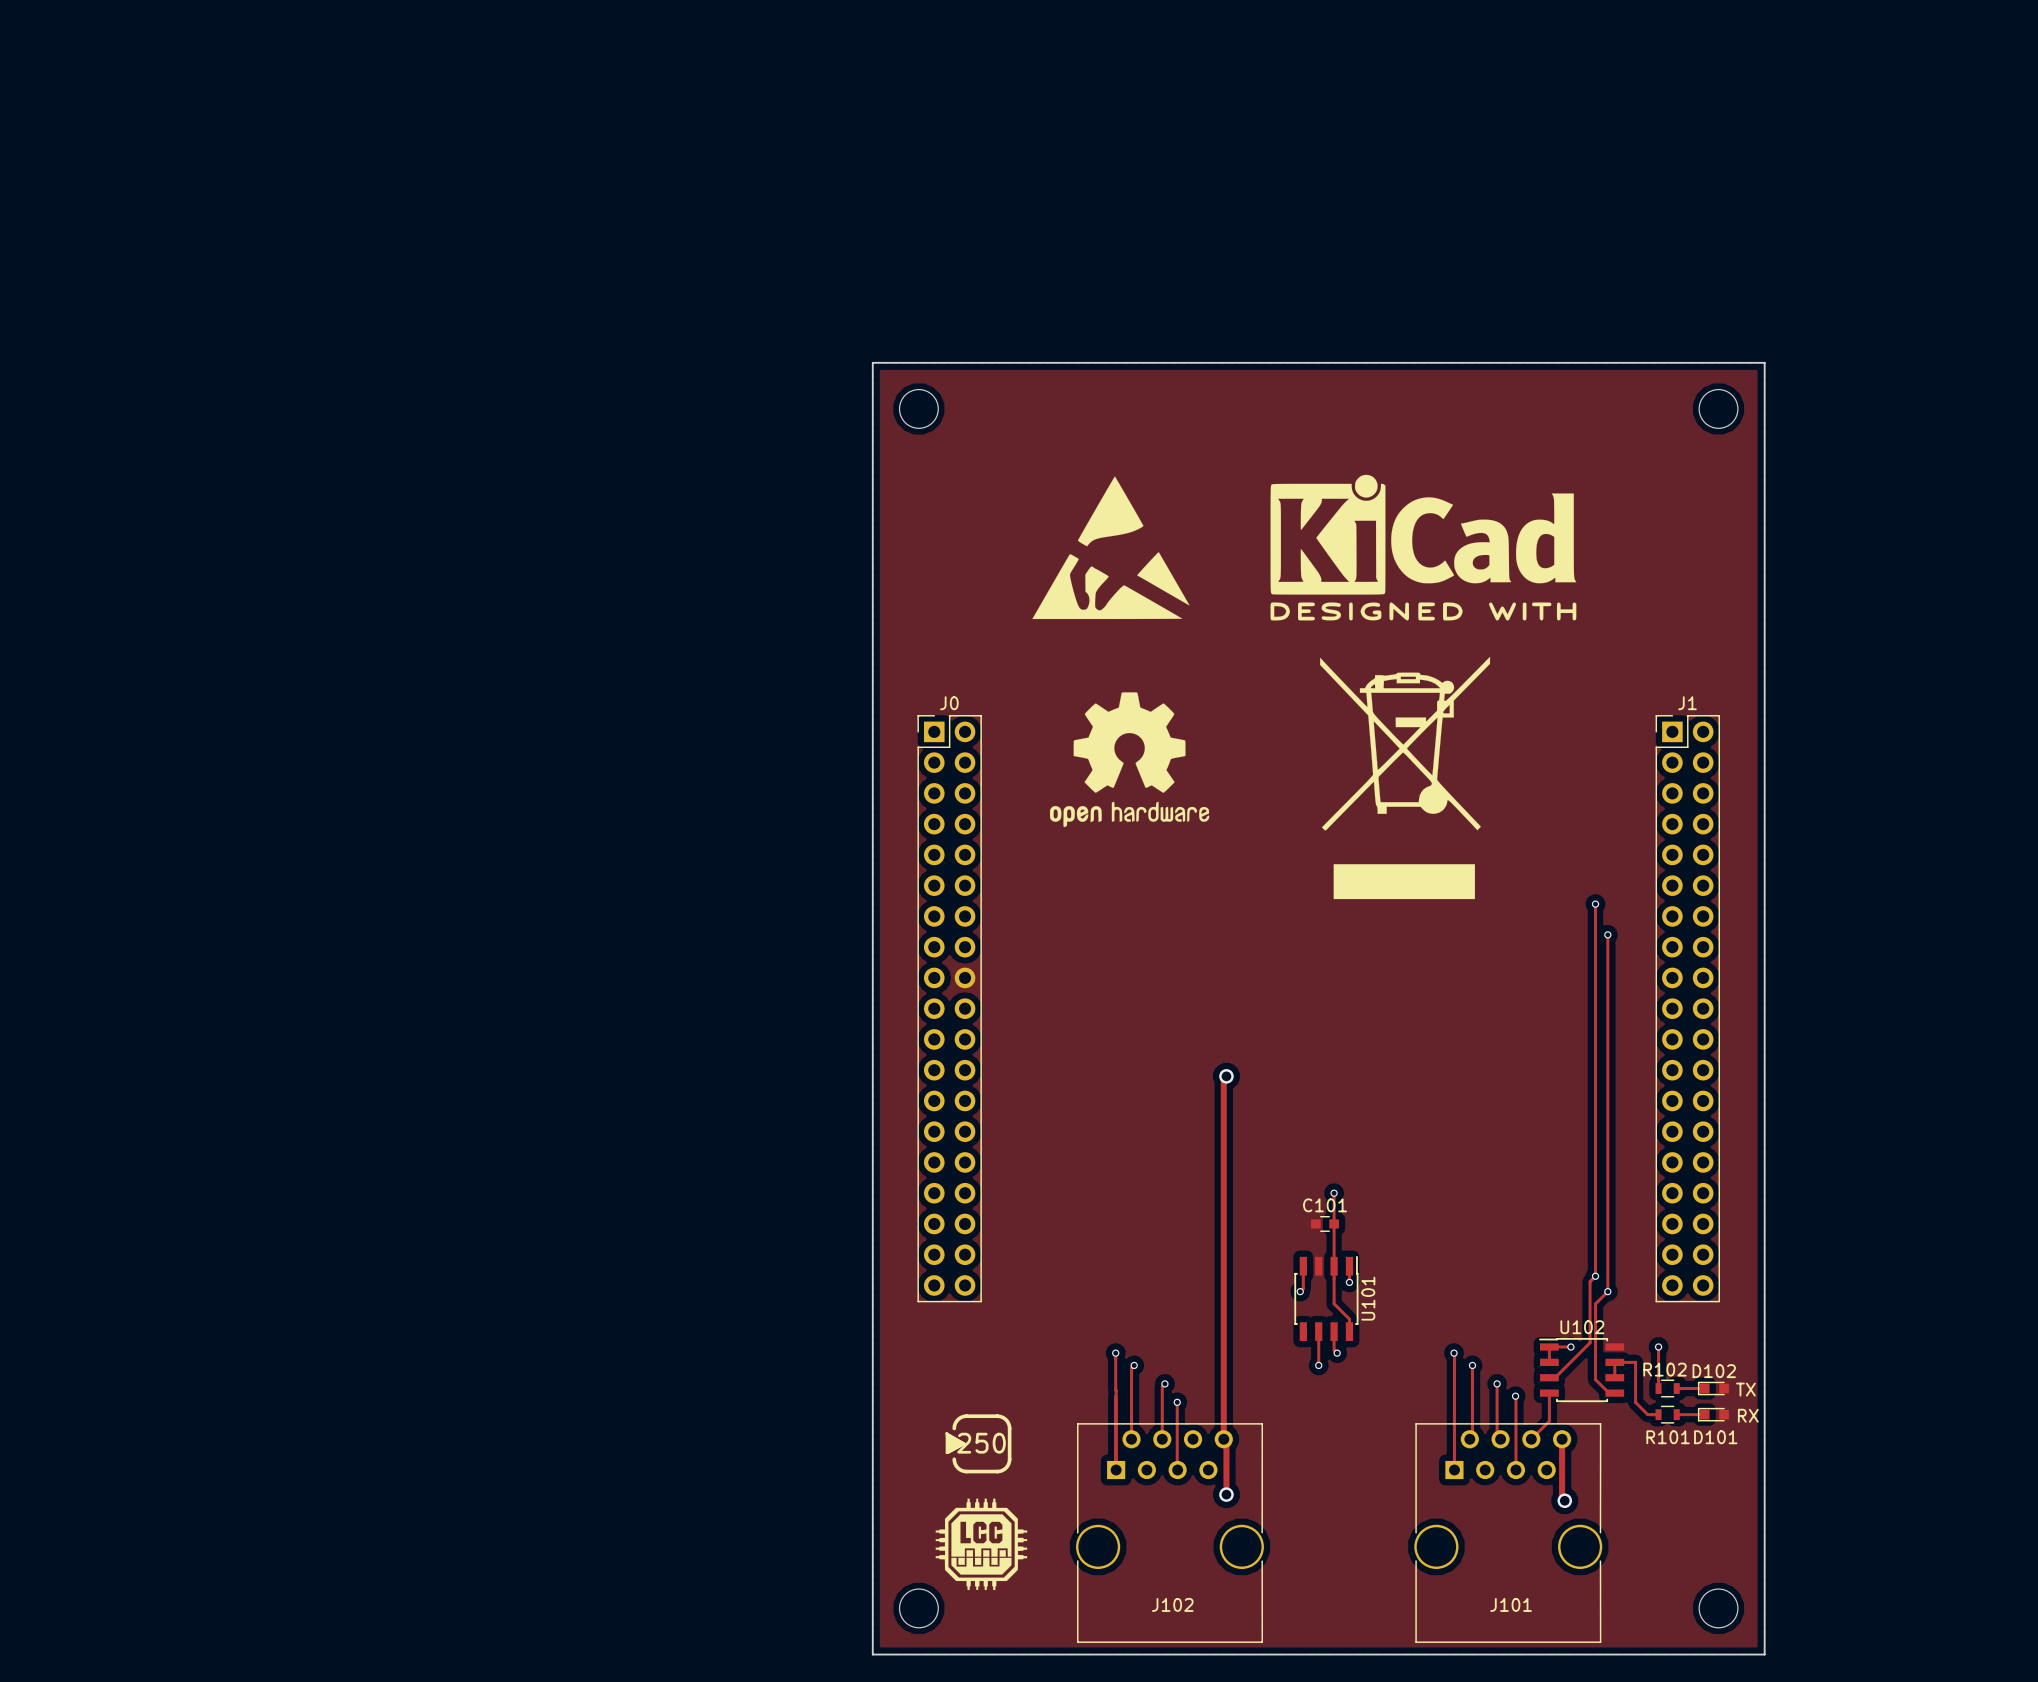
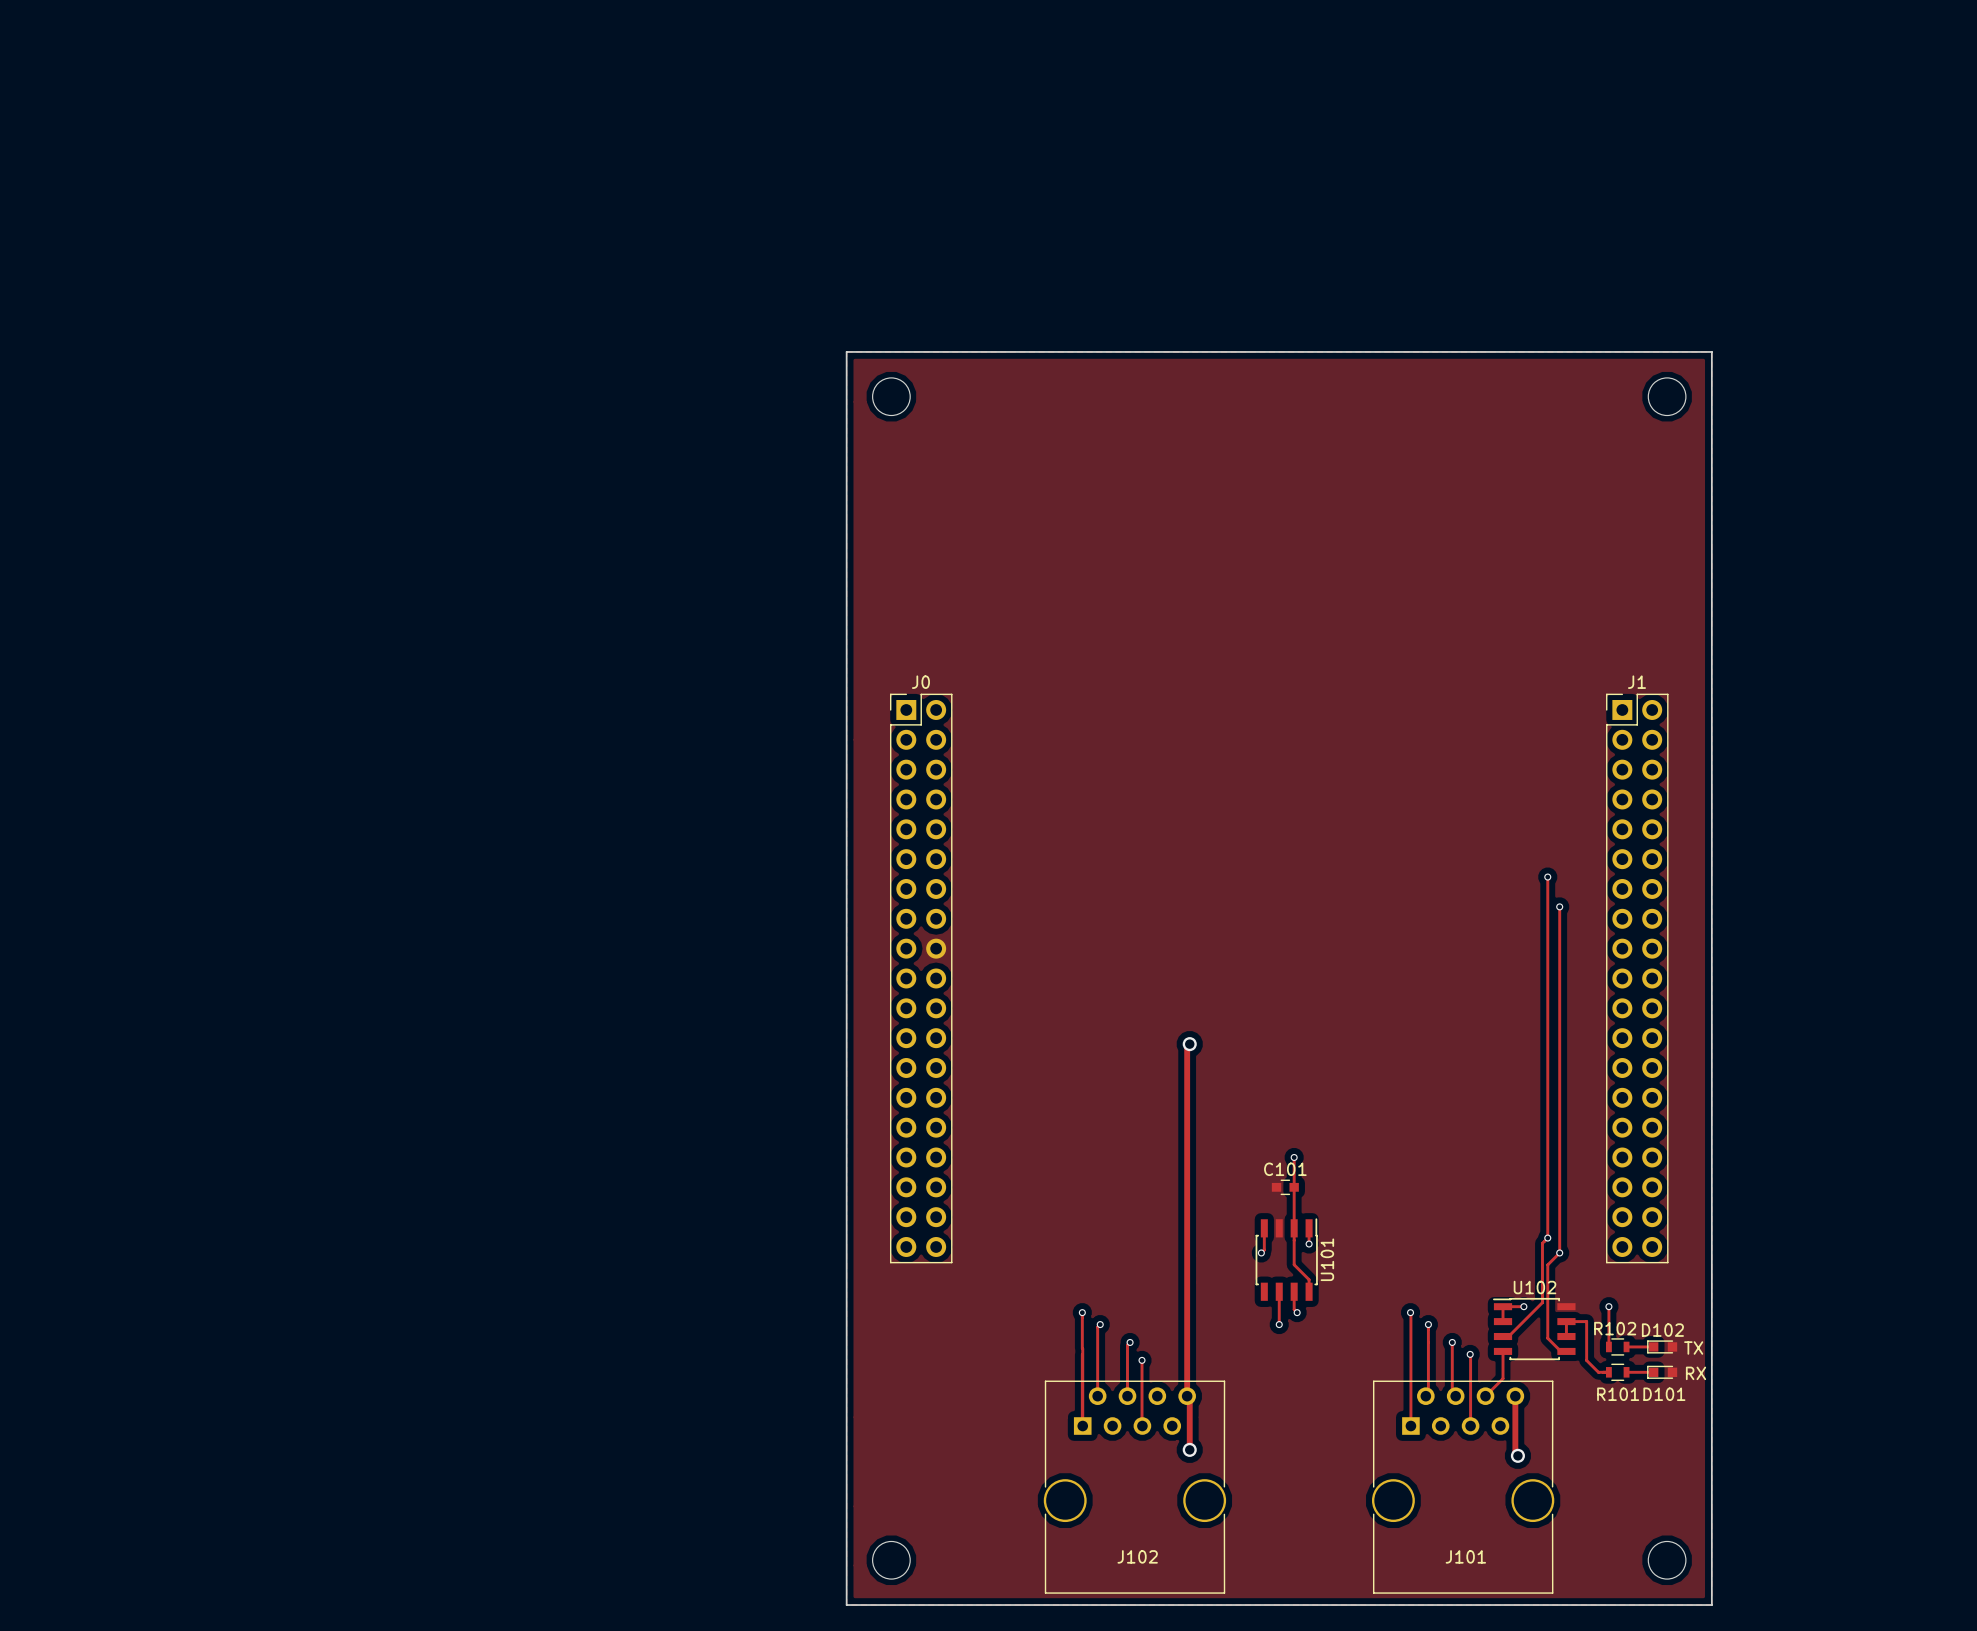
drawing: [1270, 474, 1577, 621] -> none
drawing: [1032, 476, 1190, 620] -> none
drawing: [1320, 656, 1491, 900] -> none
drawing: [1049, 692, 1210, 828] -> none
drawing: [945, 1414, 1012, 1474] -> none
drawing: [935, 1498, 1028, 1591] -> none

